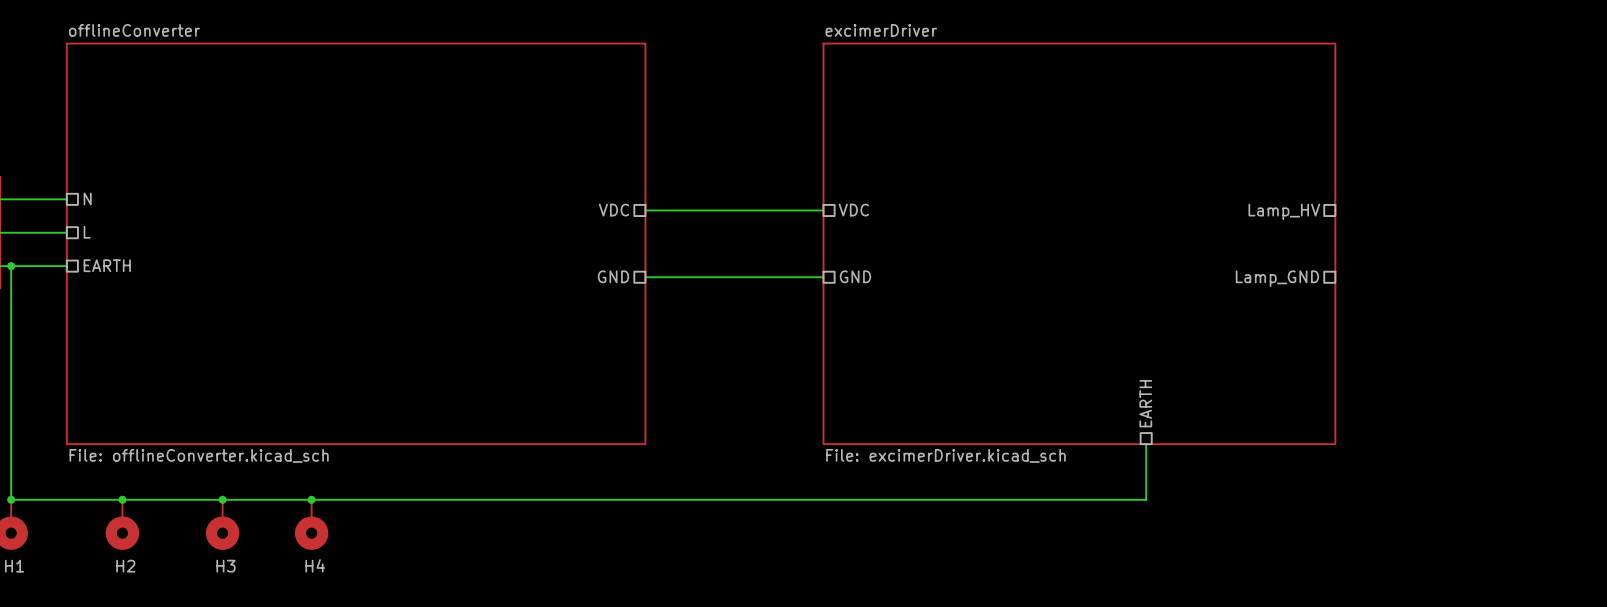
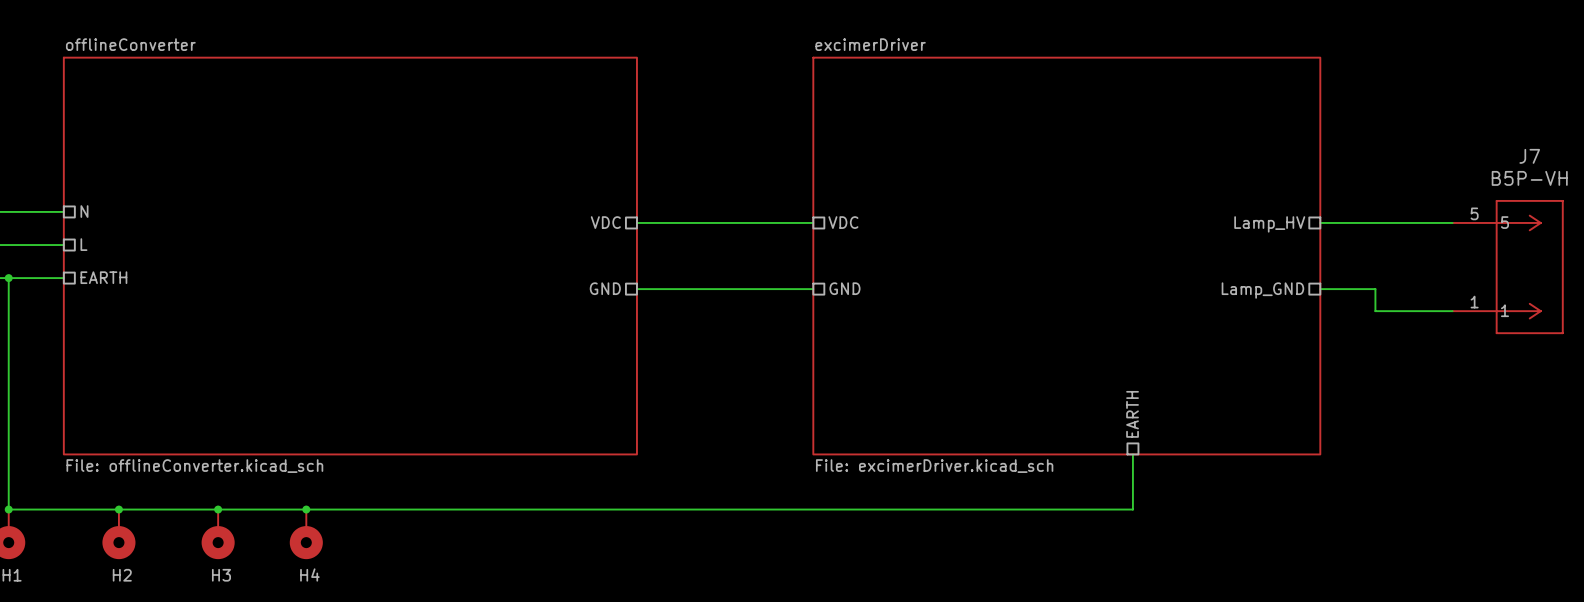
wire: none -> (1320, 222) (1452, 222)
J7: none -> B5P-VH (1507, 267)
wire: none -> (1320, 289) (1375, 289) (1375, 311) (1452, 311)

